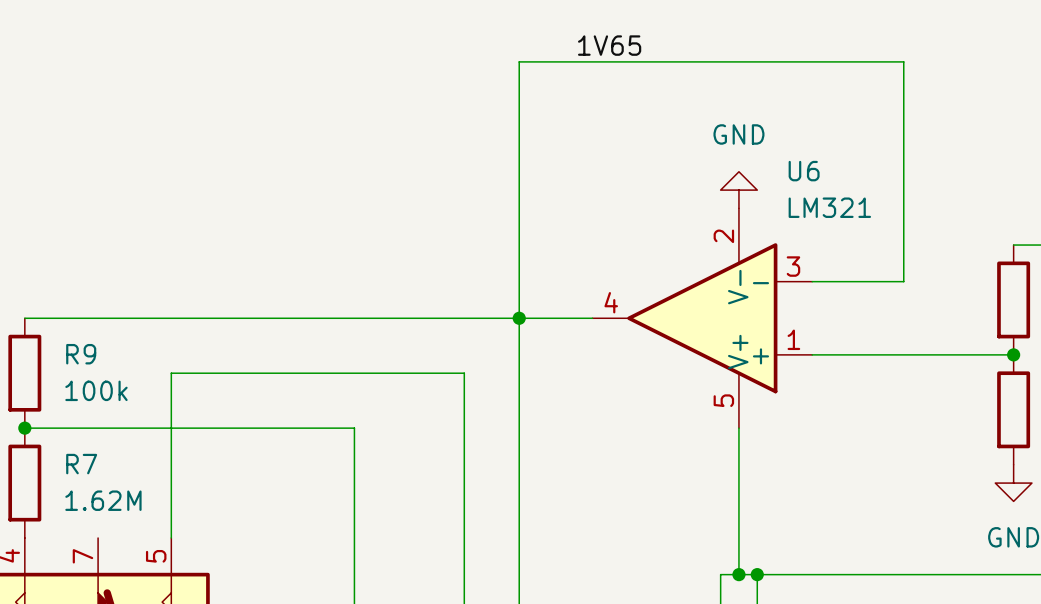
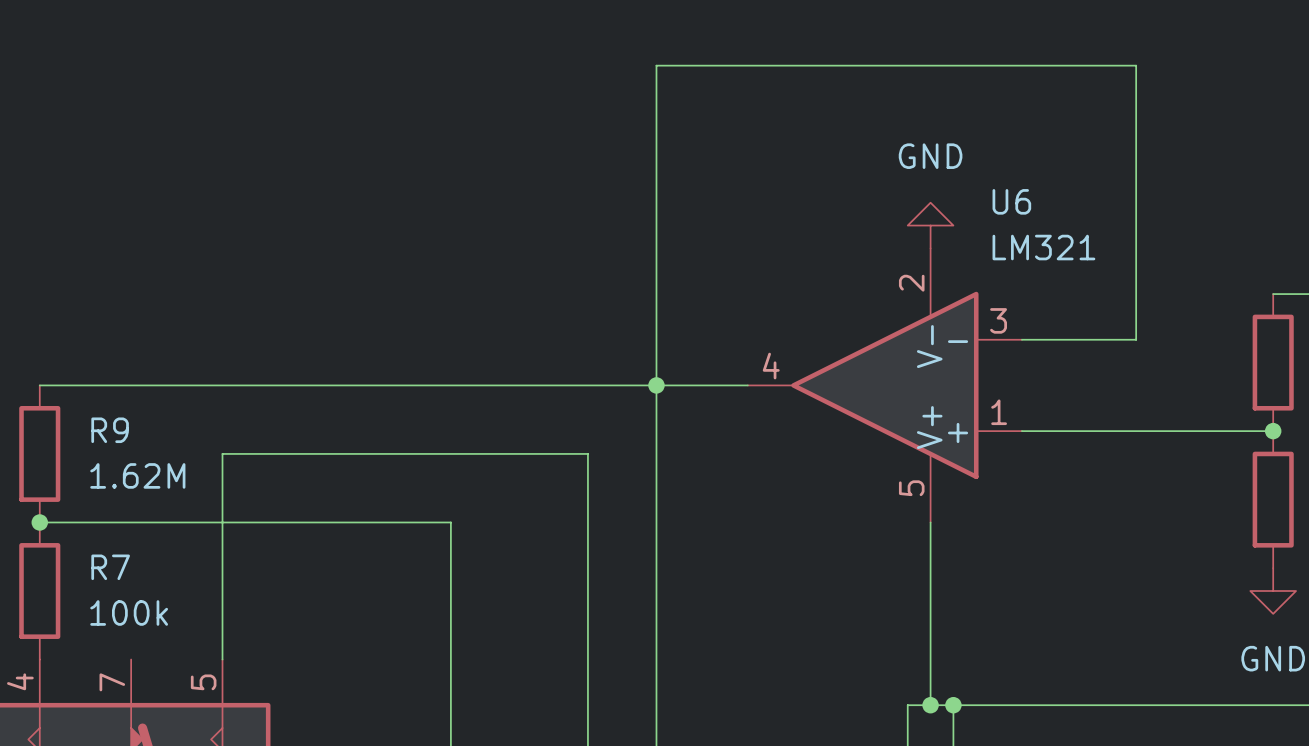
label: 1V65 (609, 45) -> none
R9 value: 100k (96, 390) -> 1.62M (137, 475)
R7 value: 1.62M (103, 500) -> 100k (129, 612)

